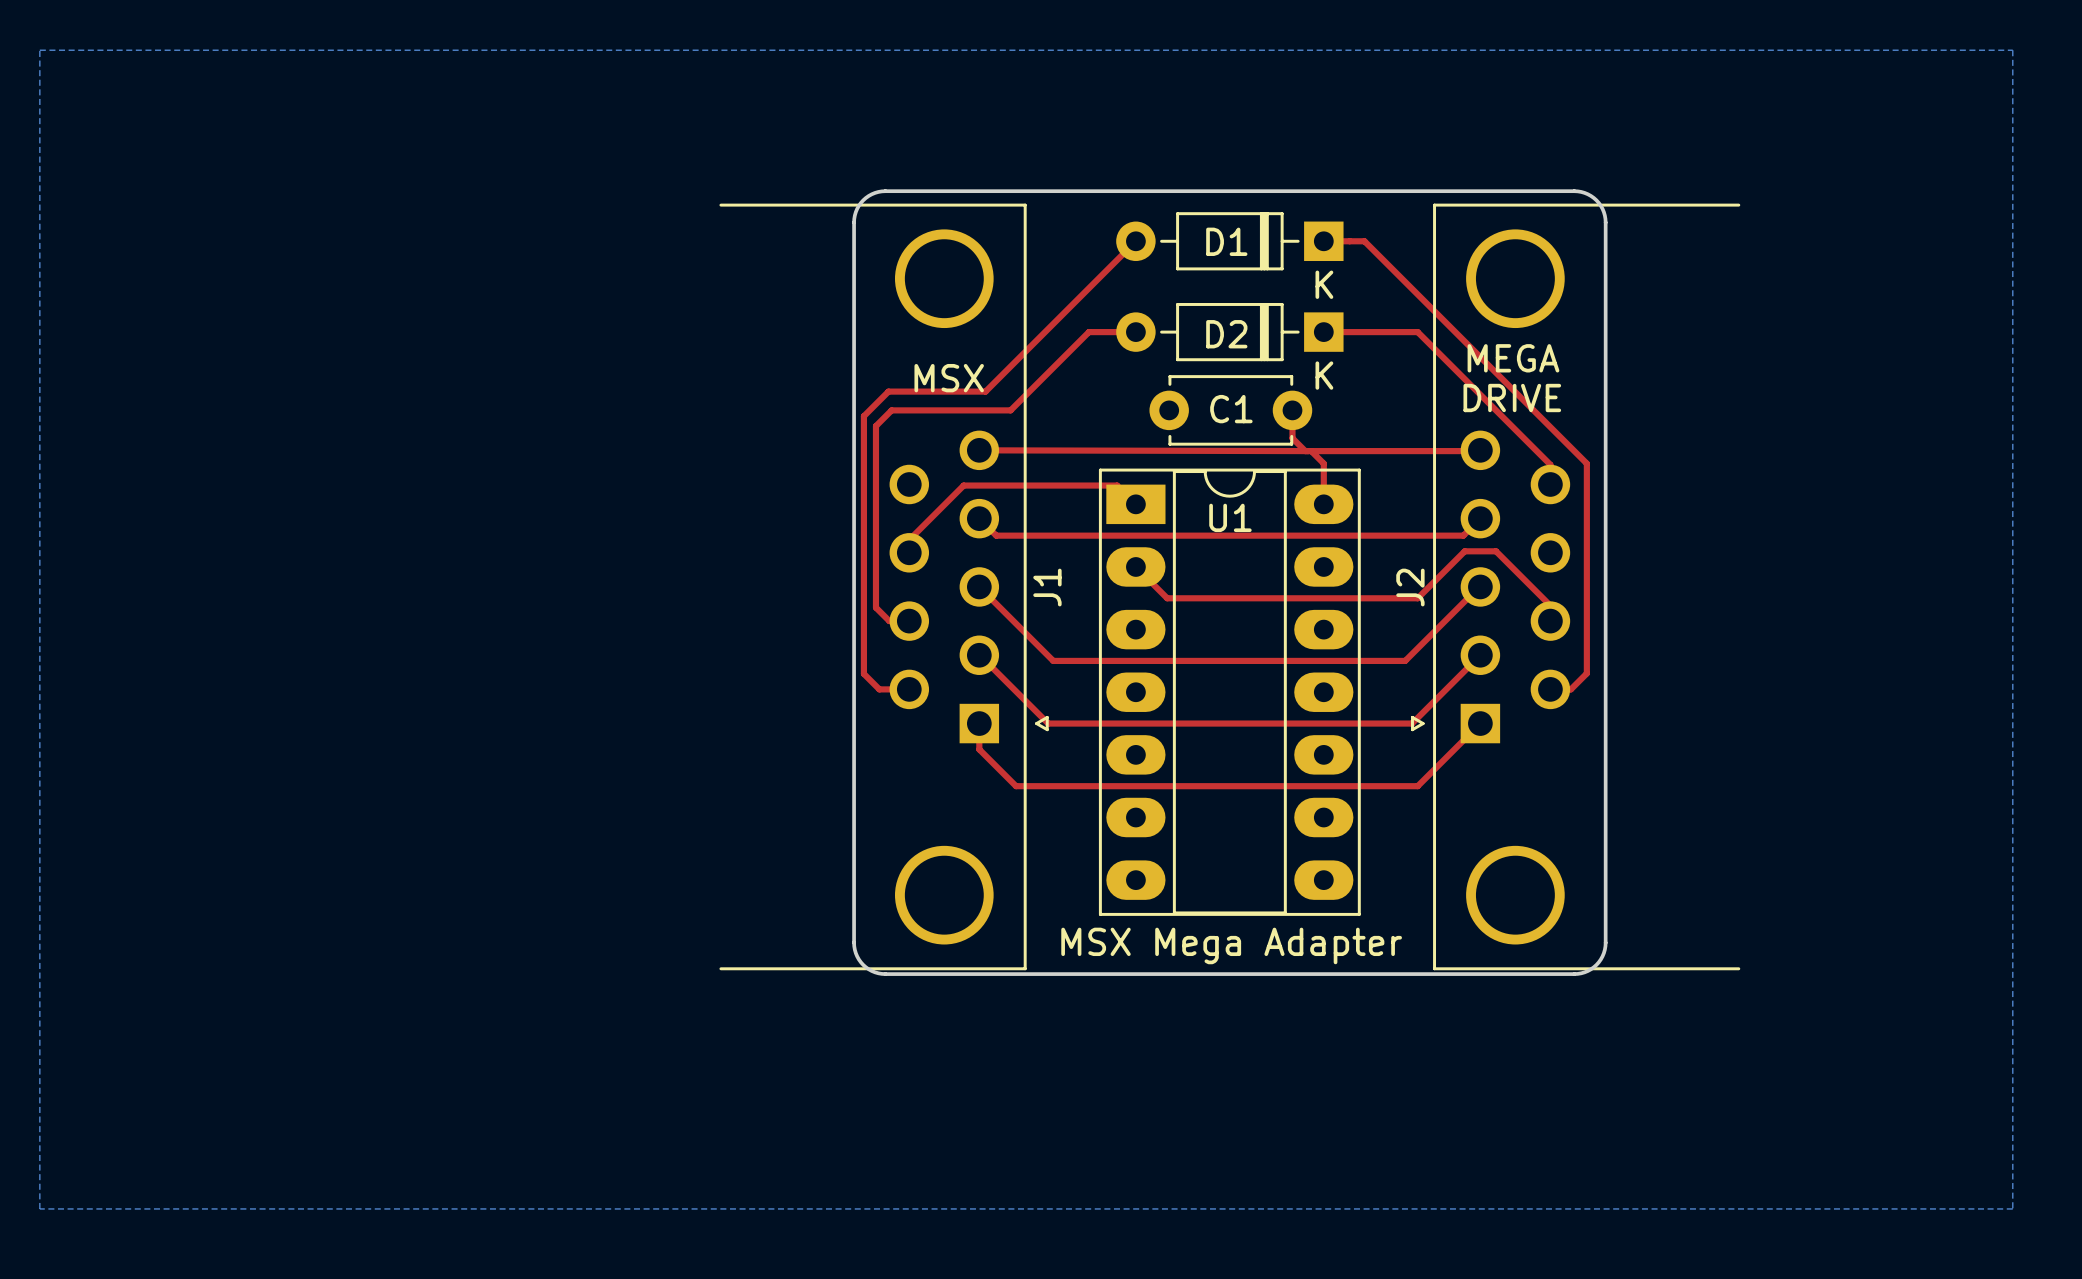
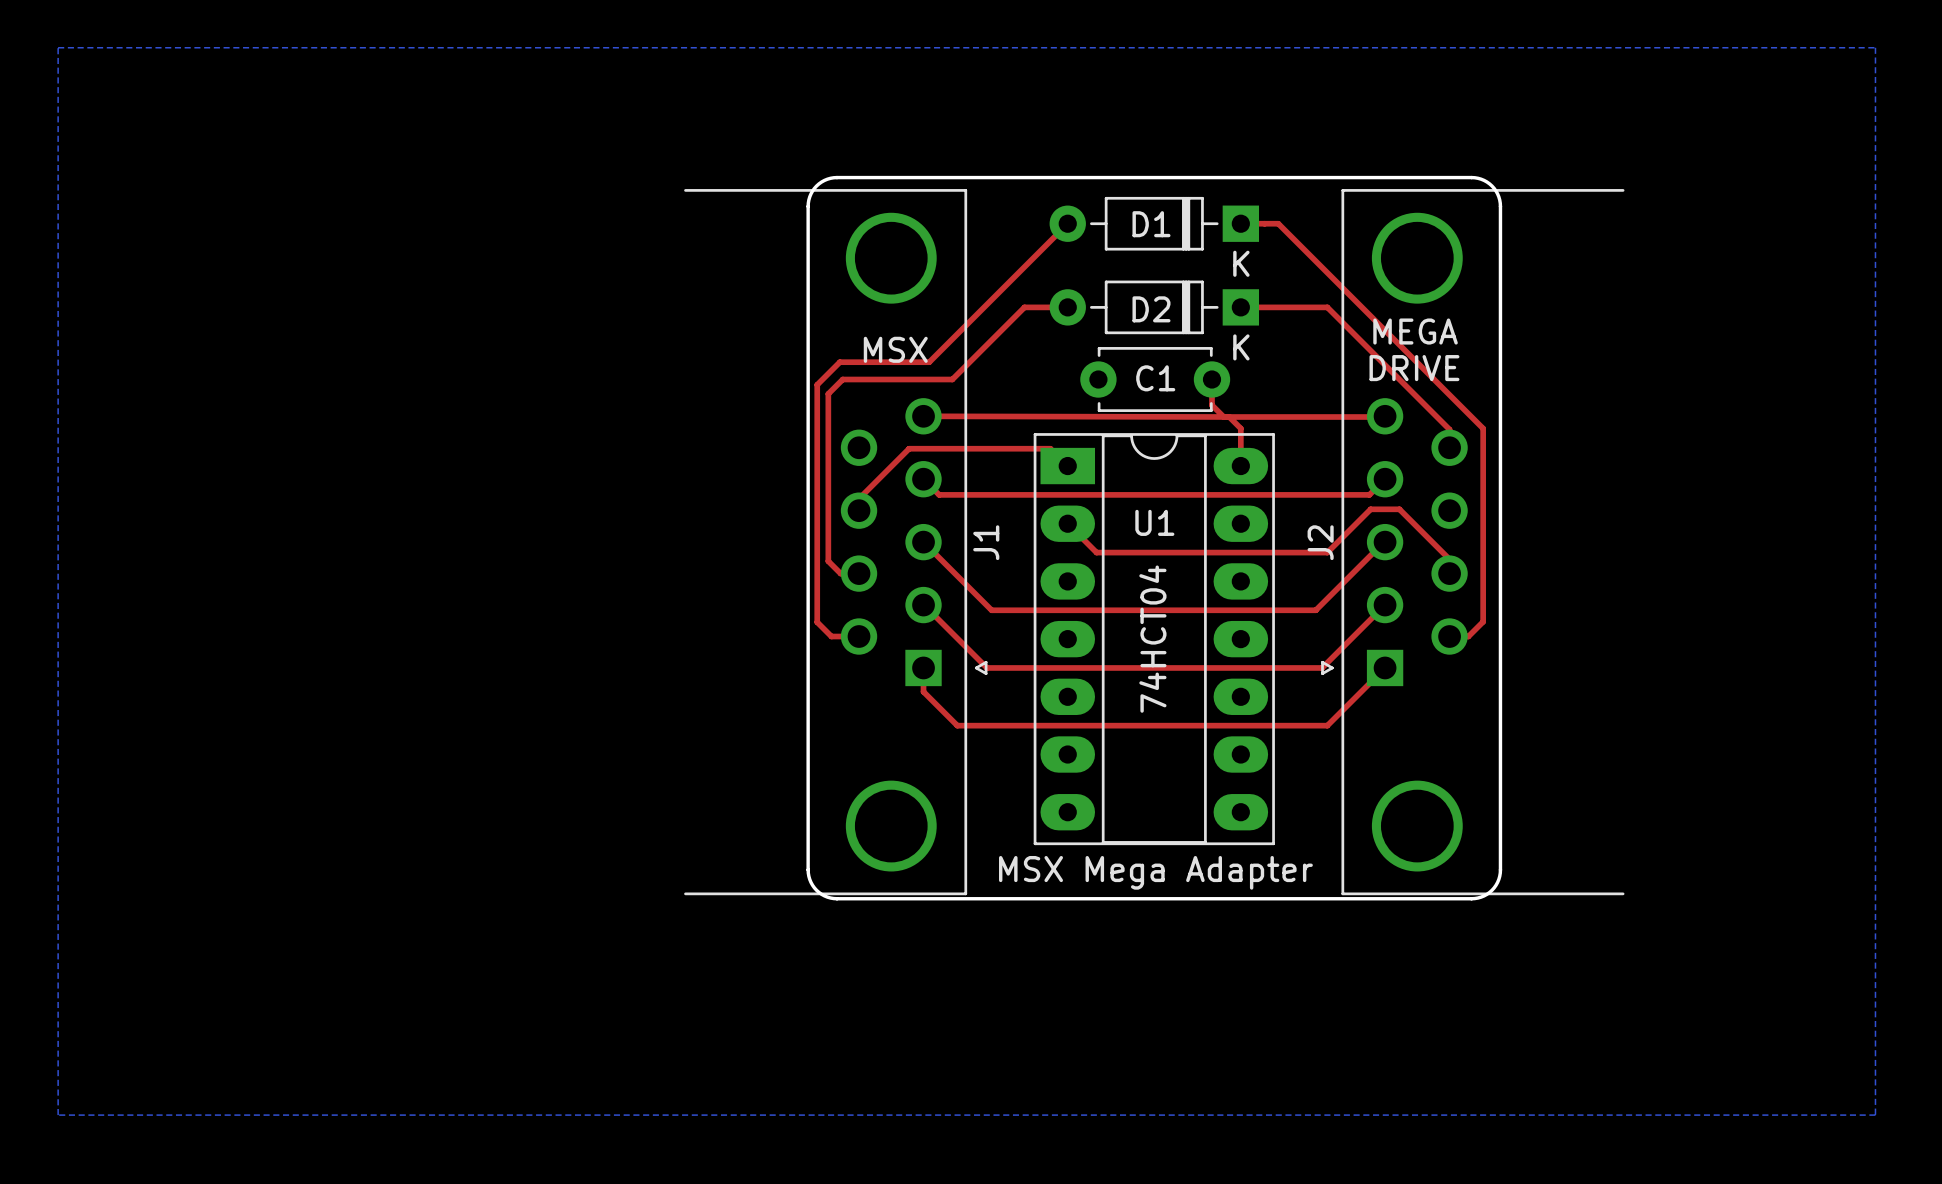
U1 name position: U1 (1230, 517) -> U1 (1154, 522)
U1 value: none -> 74HCT04 (1152, 639)

